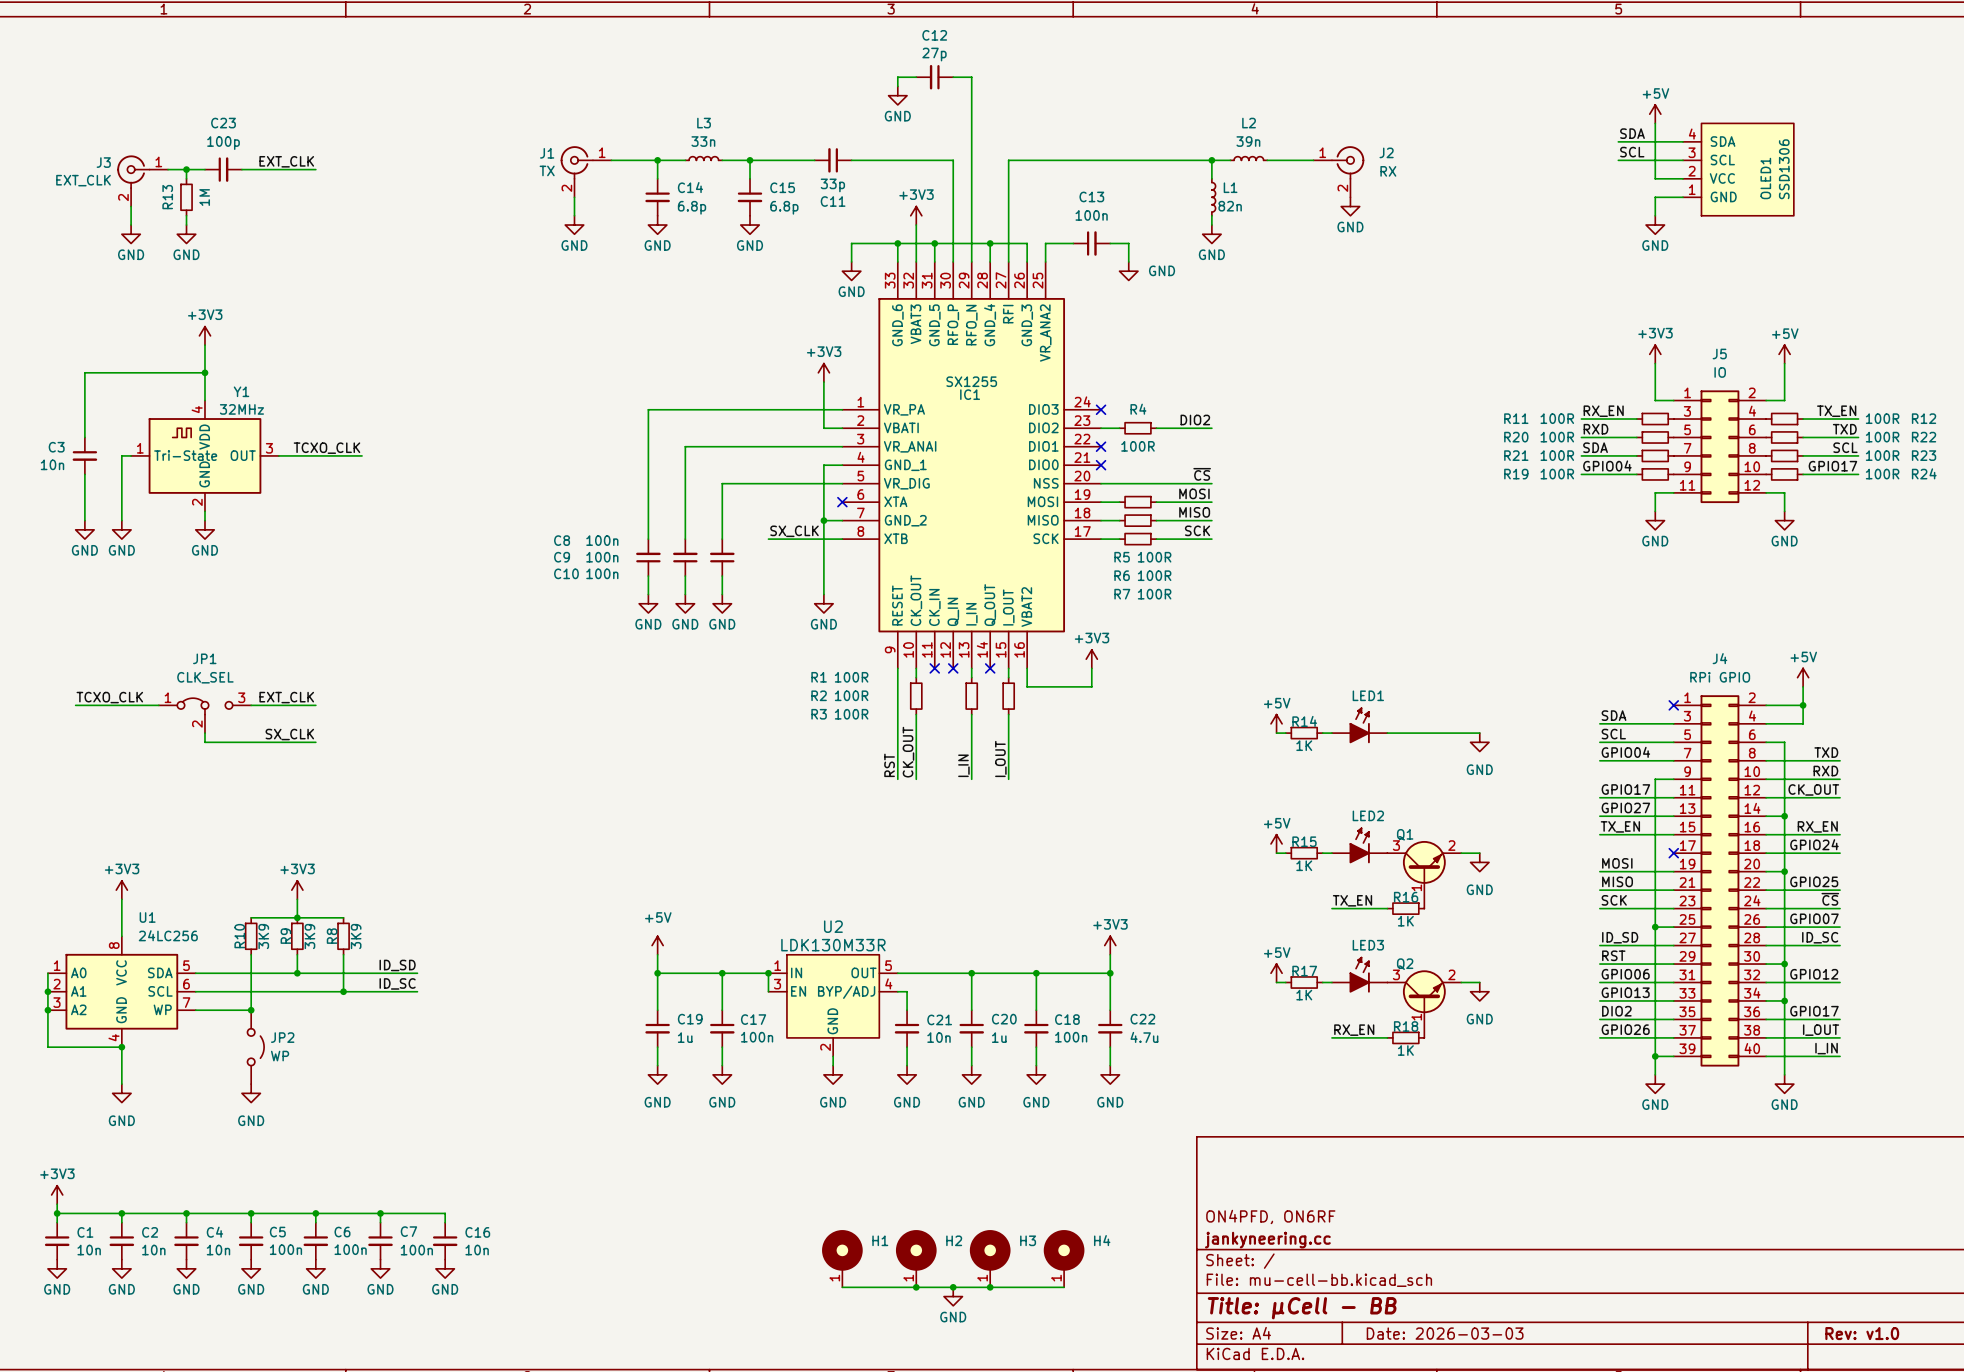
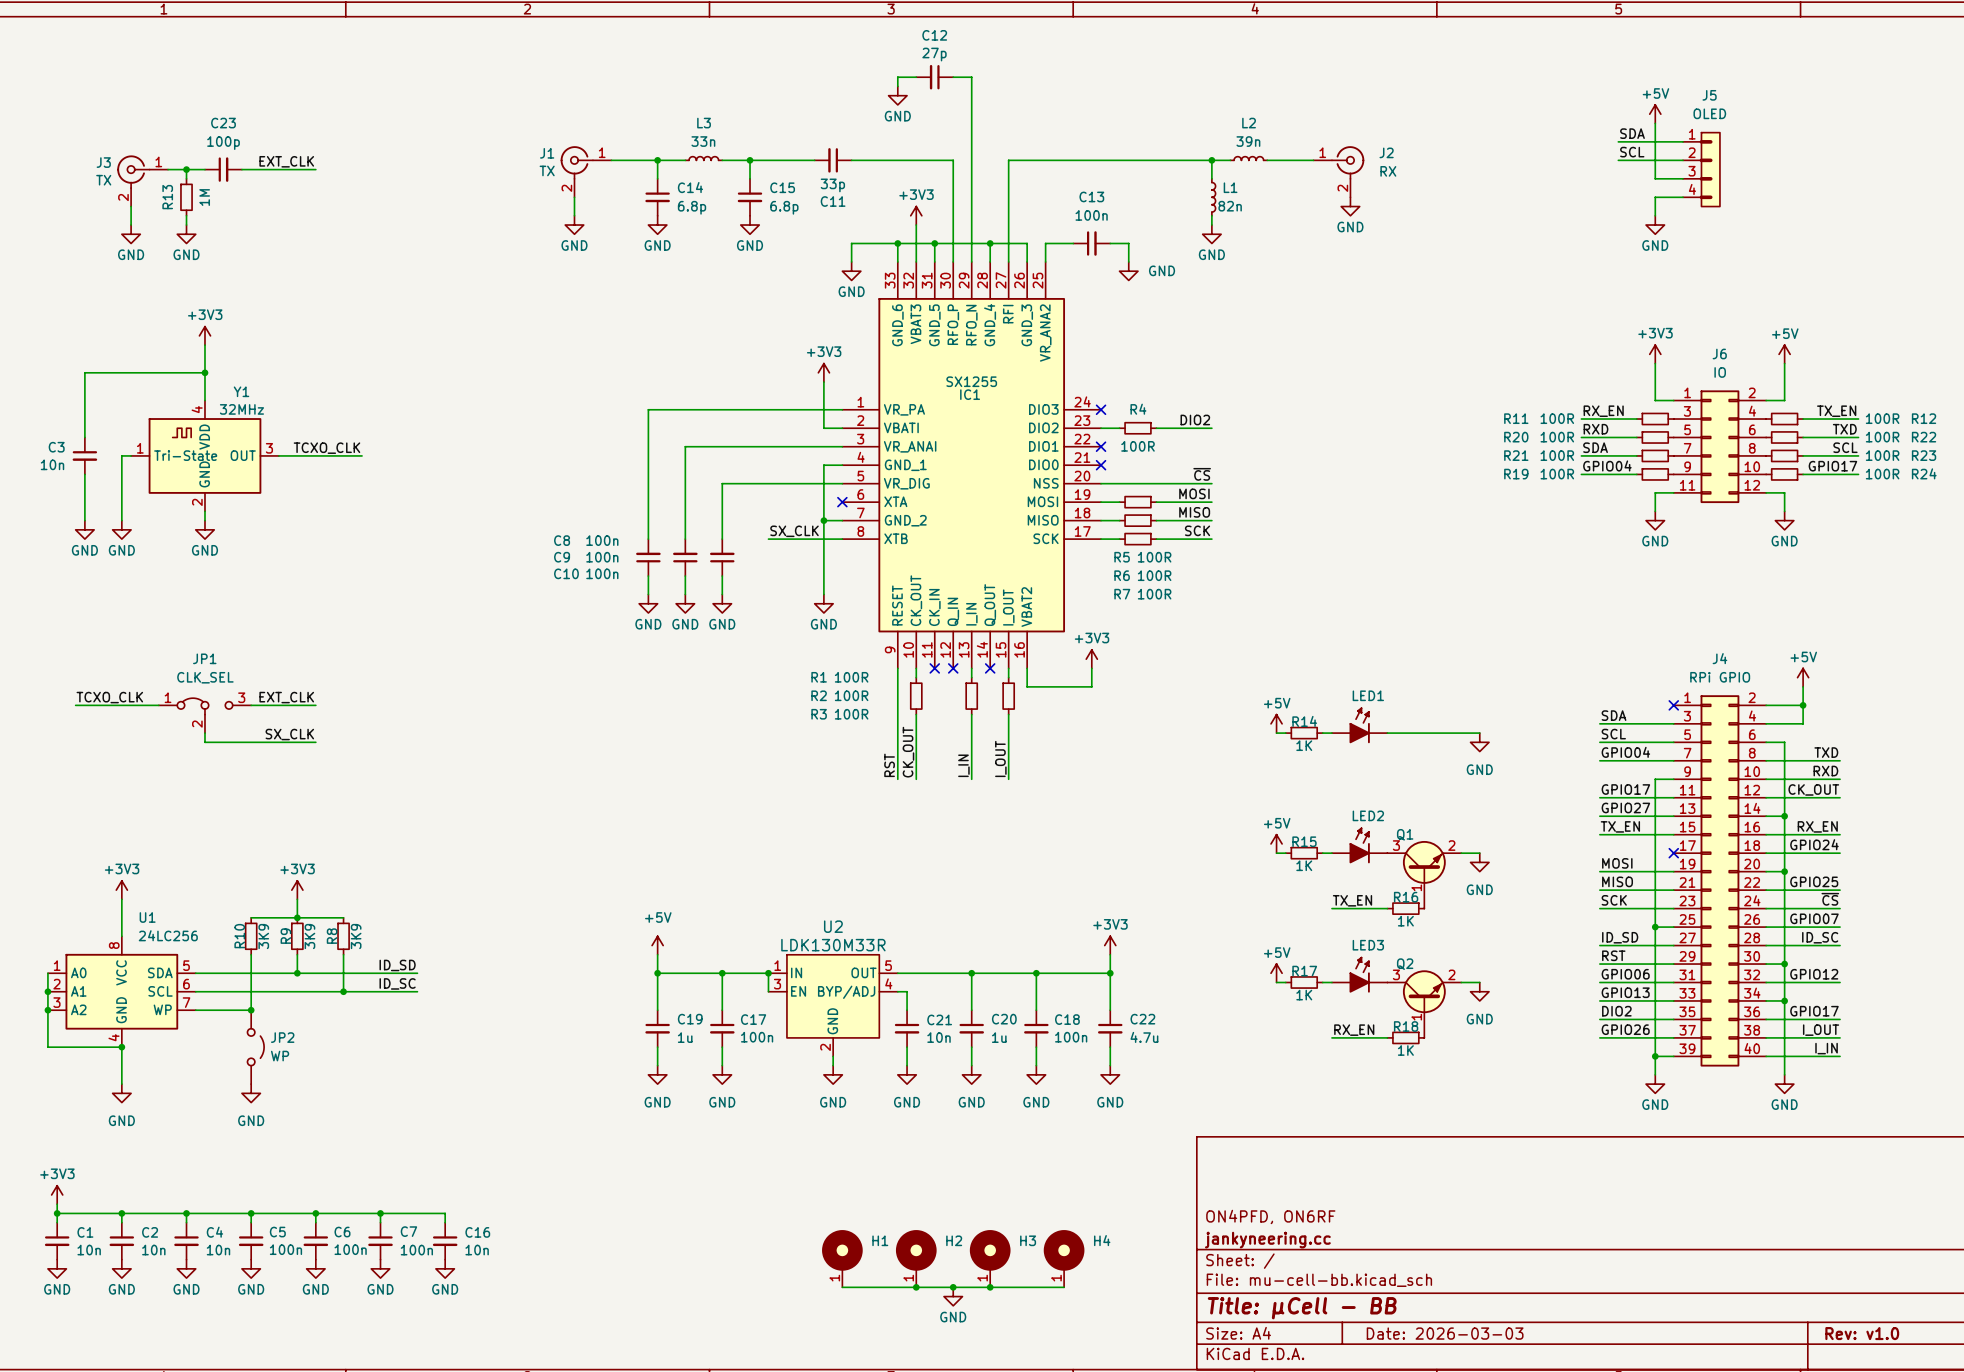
J5: none -> OLED (1701, 169)
OLED1: SSD1306 (1738, 169) -> none
J3 value: EXT_CLK (83, 180) -> TX (103, 180)
J5 name: J5 (1719, 354) -> J6 (1719, 354)

